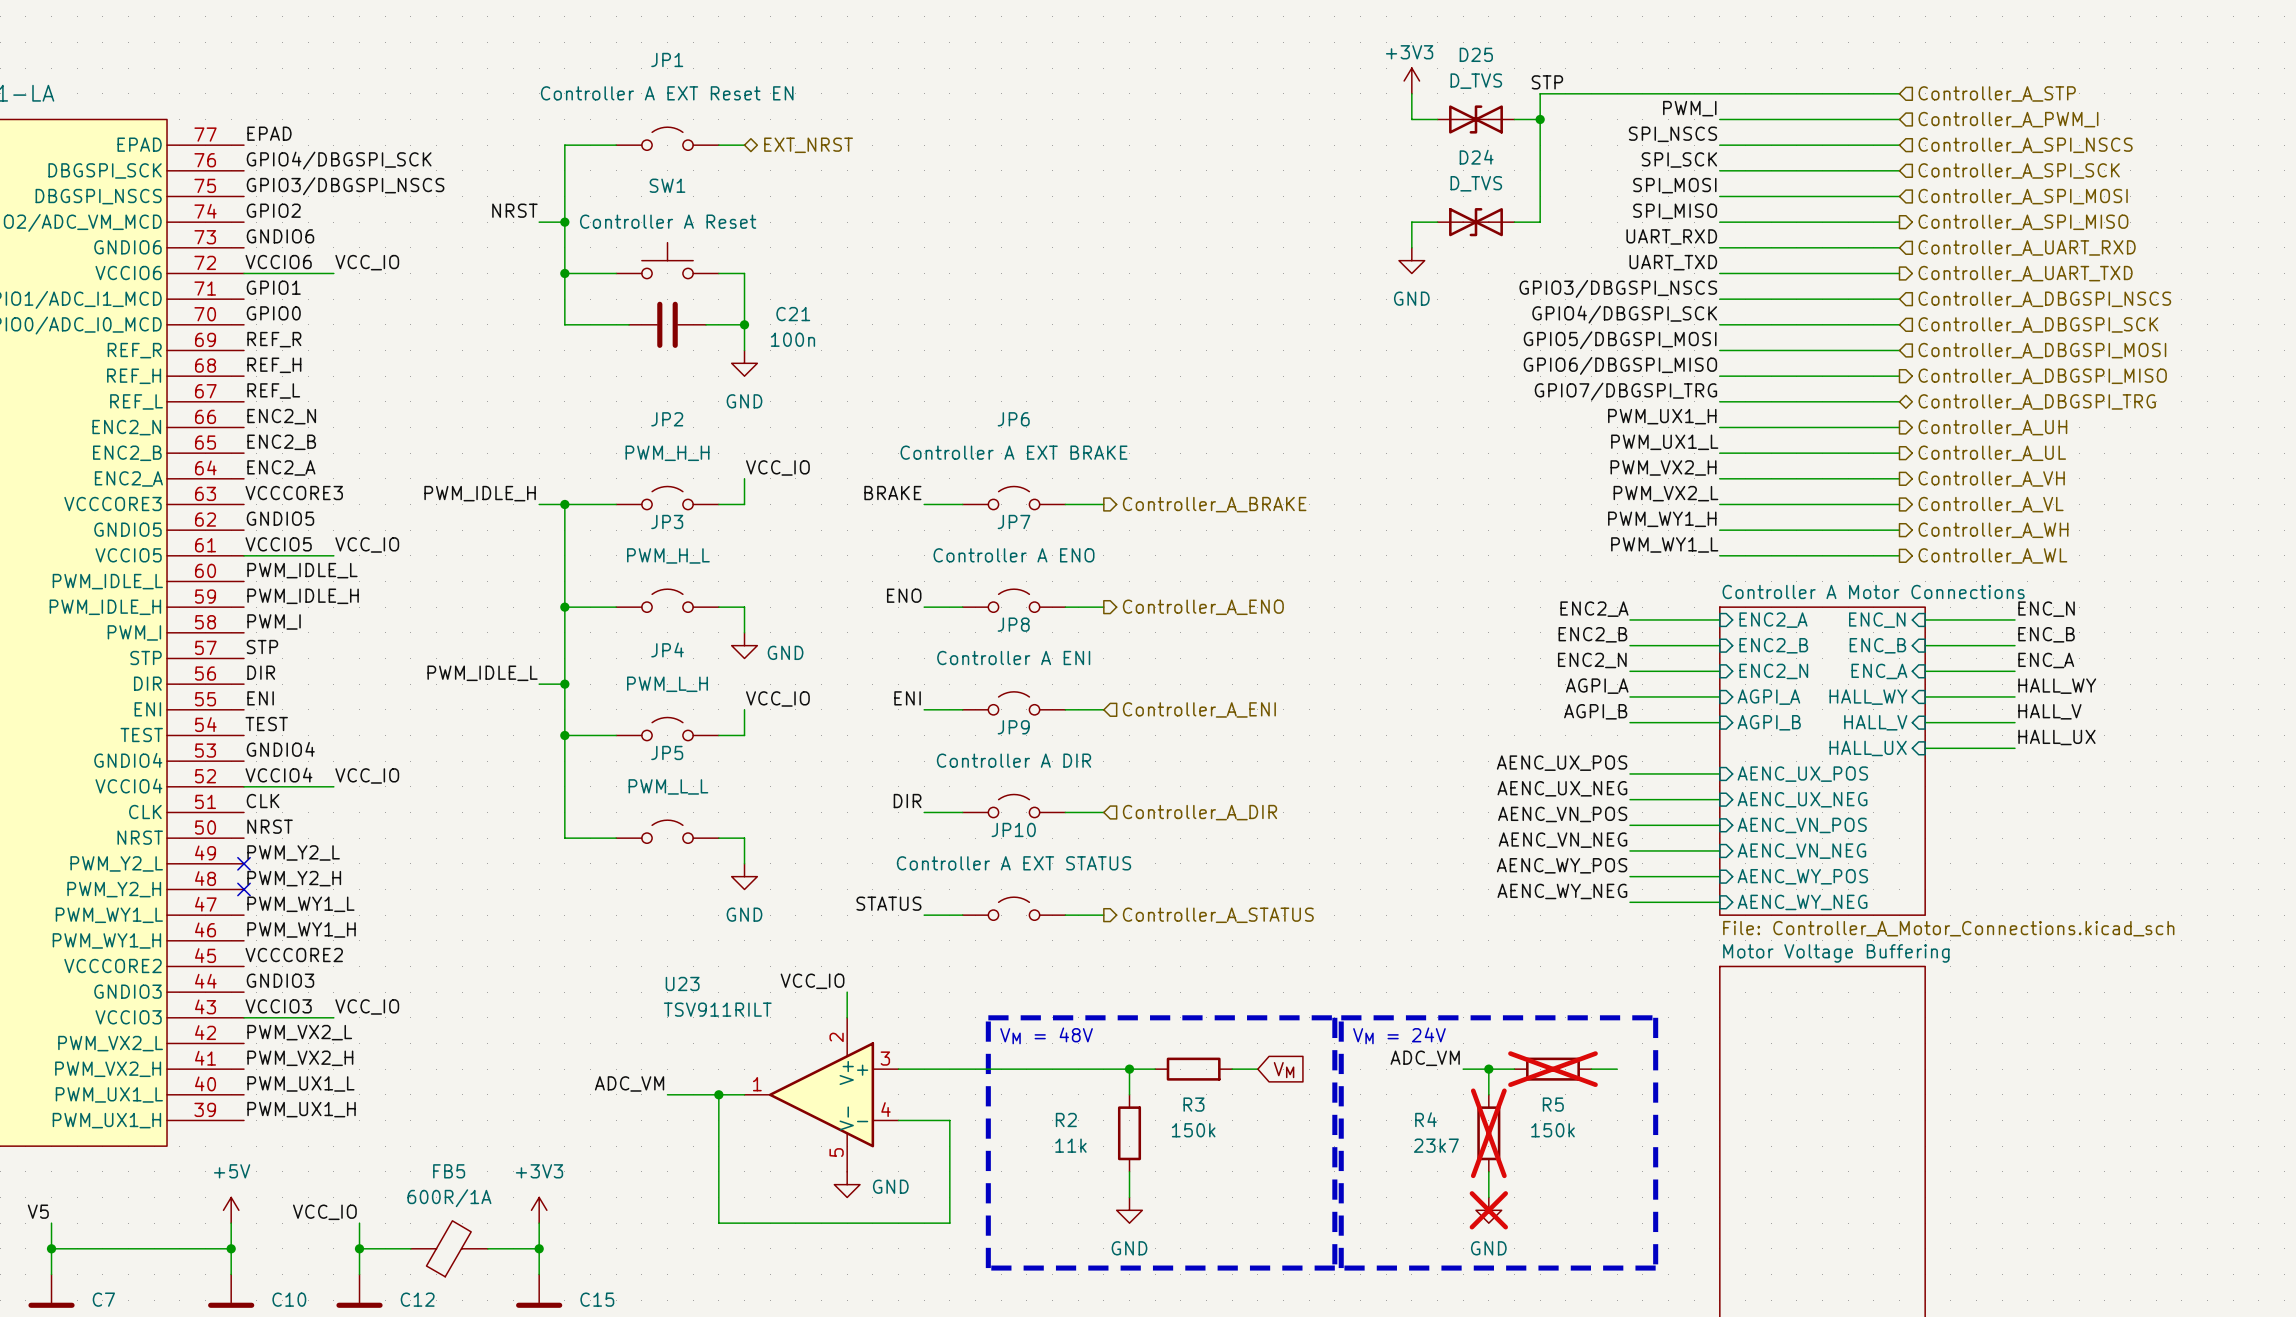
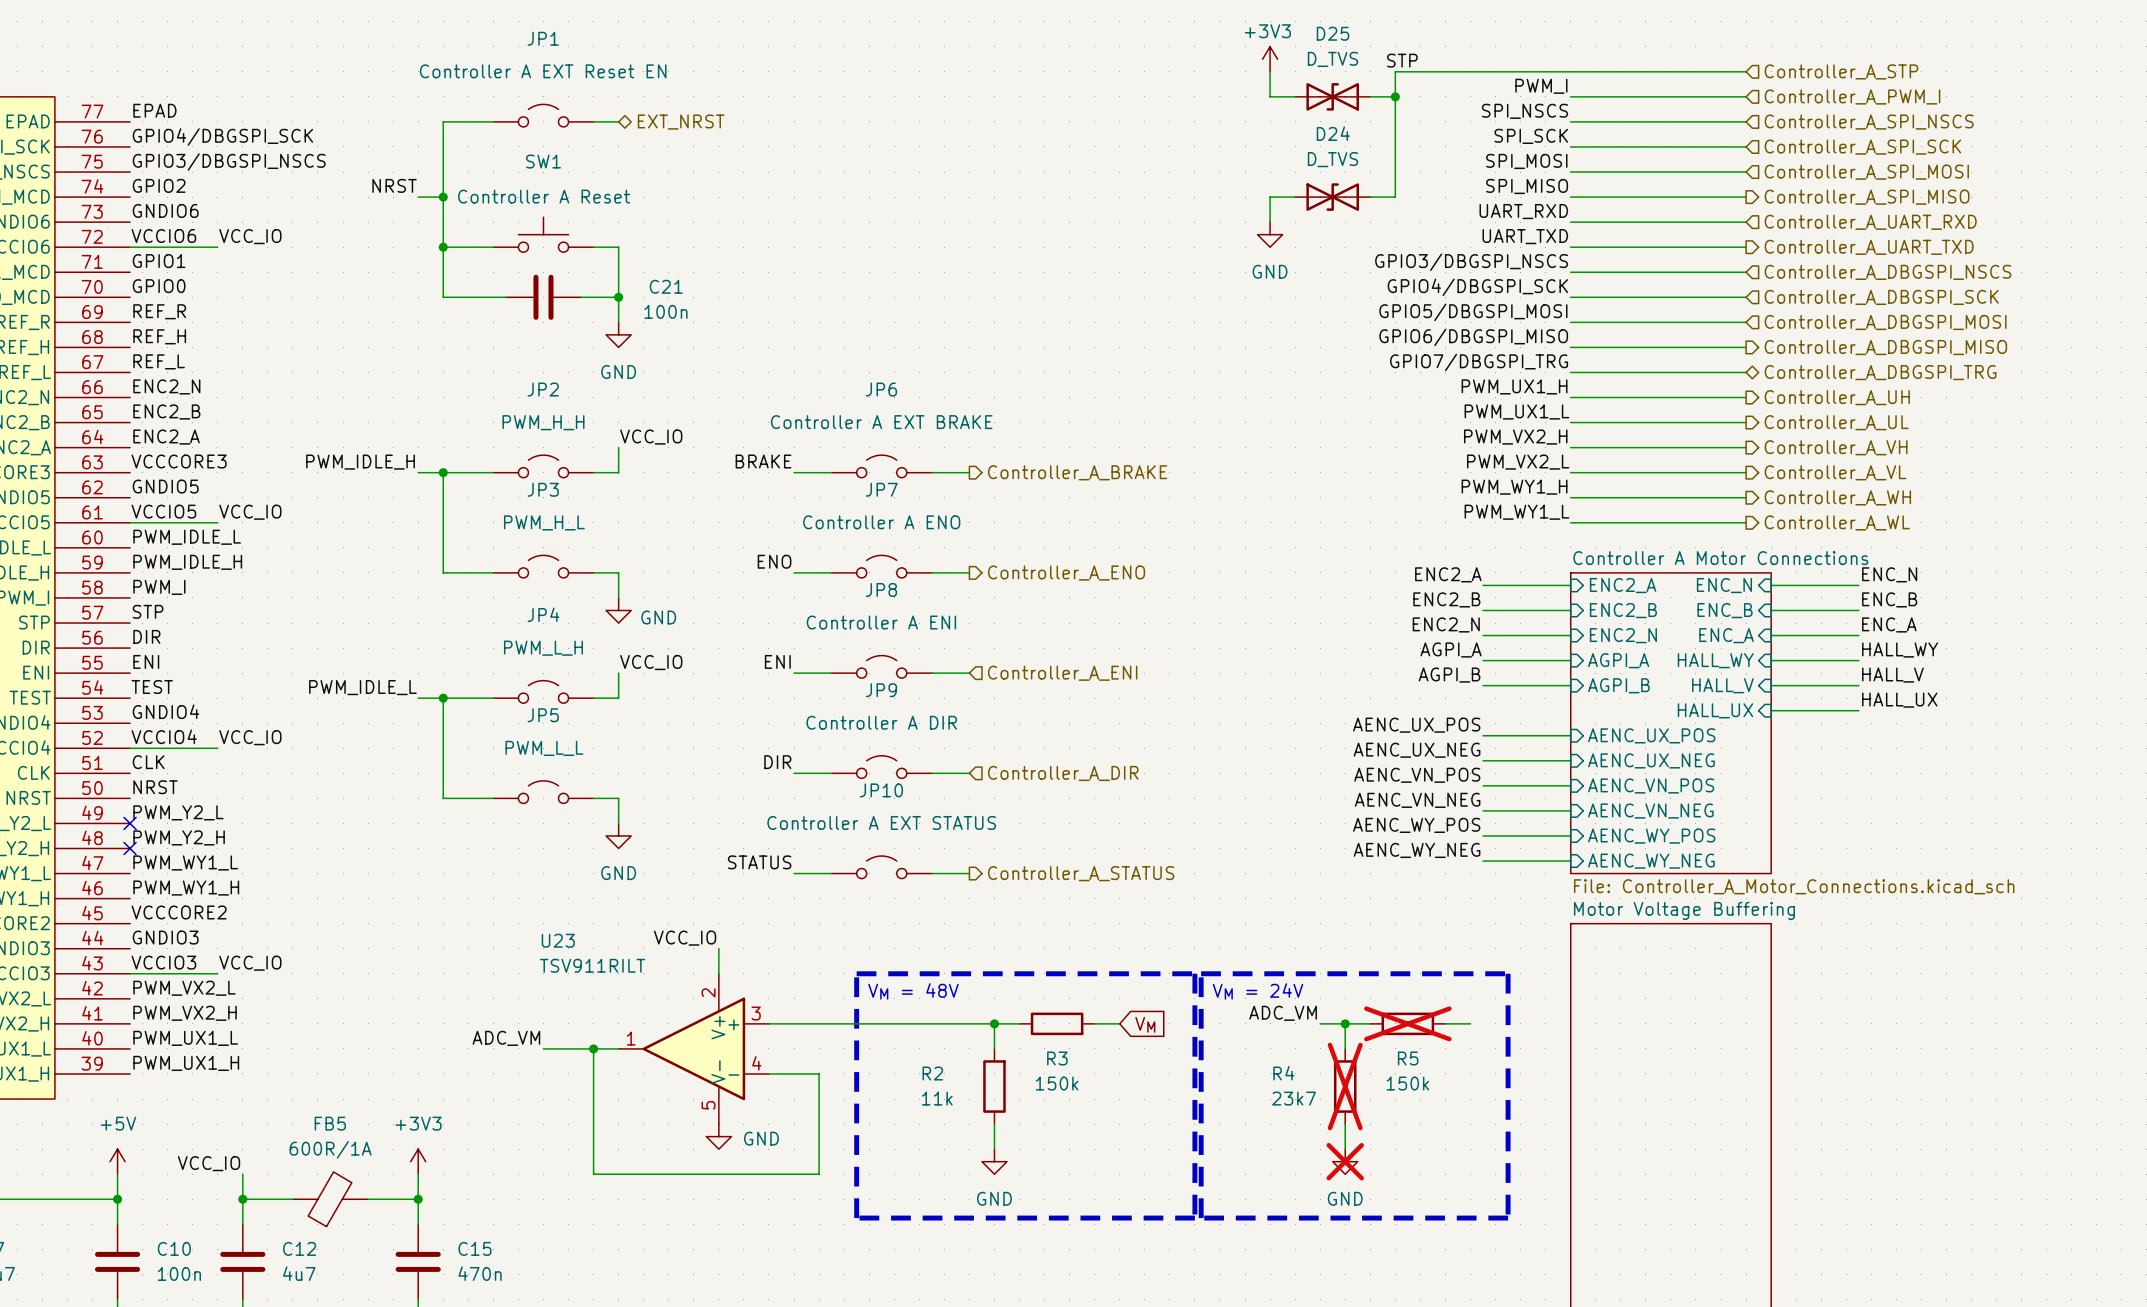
wire: (564, 607) (564, 735) -> (418, 698) (443, 698)
junction: (564, 607) -> none
label position: PWM_IDLE_L (482, 673) -> PWM_IDLE_L (362, 687)
wire: (539, 684) (564, 684) -> none
junction: (564, 684) -> none

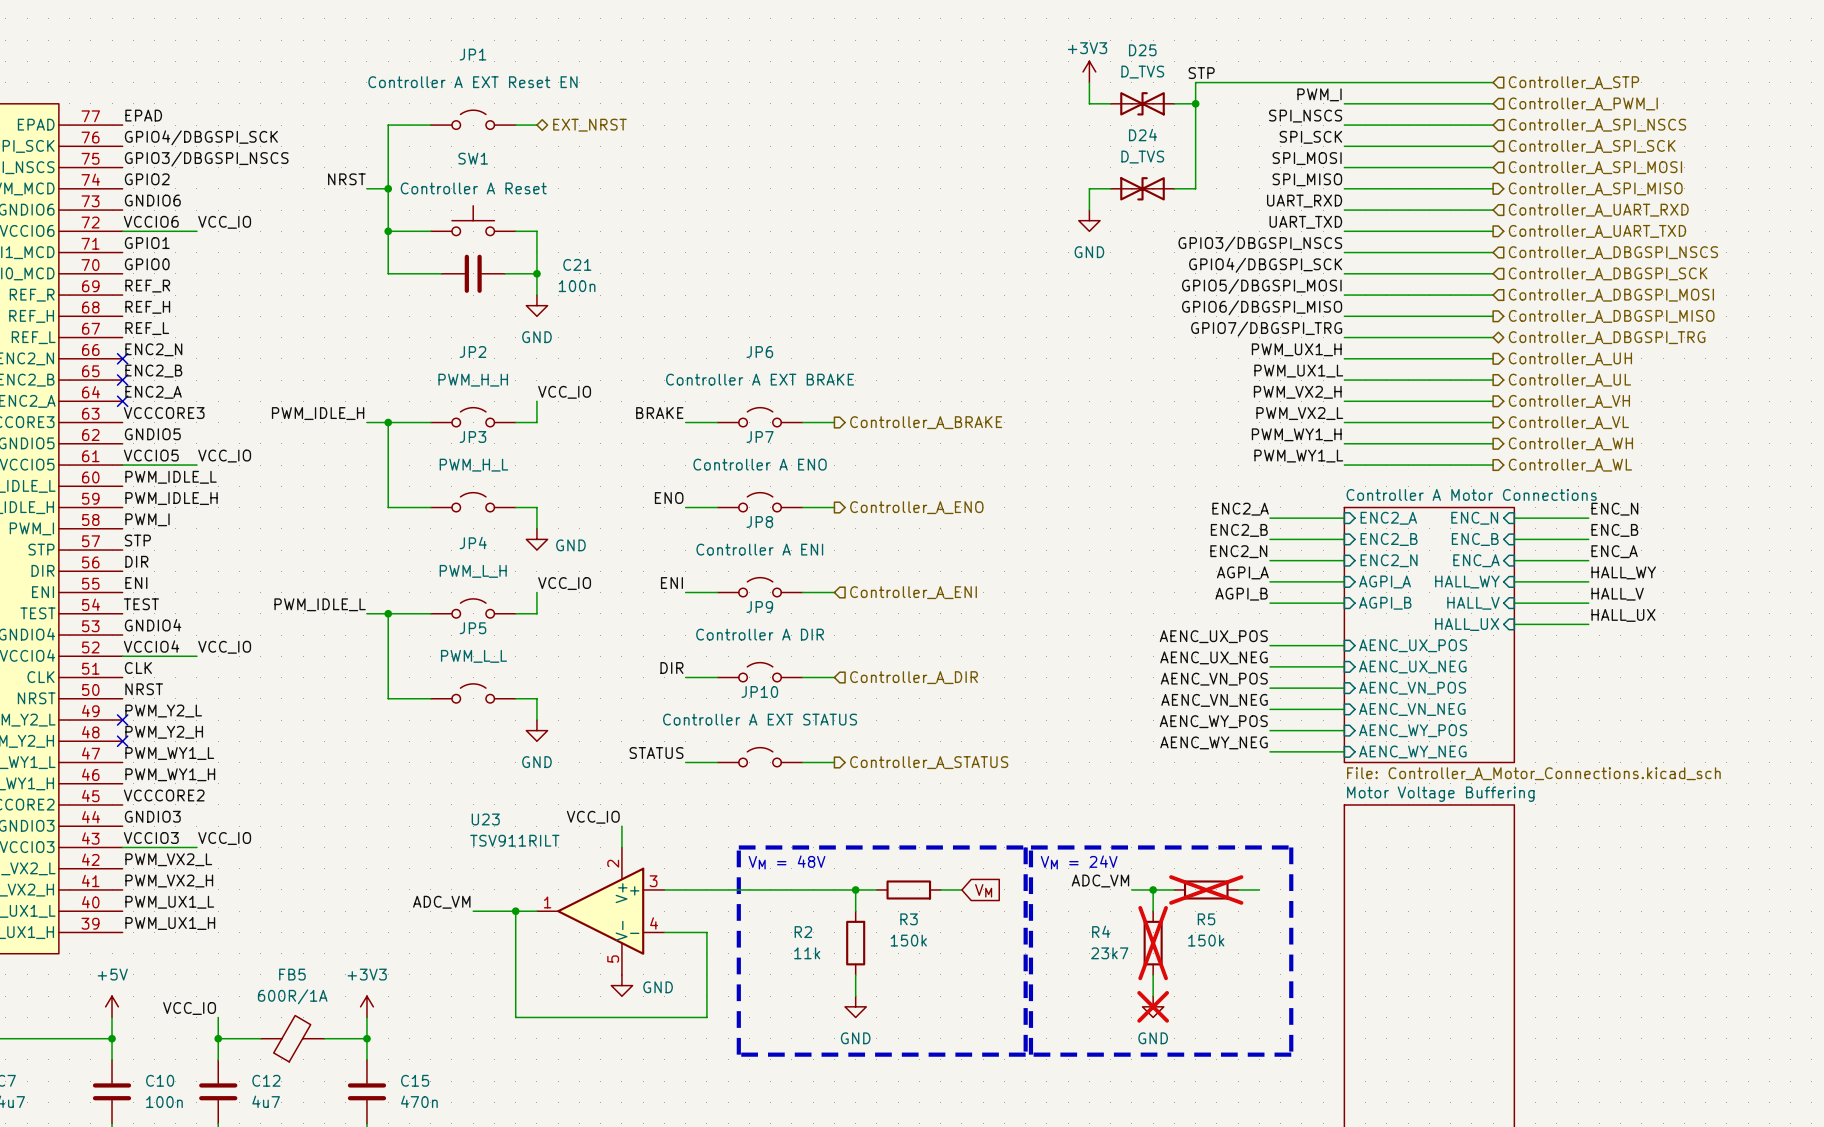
no-connect mark: none -> (122, 358)
no-connect mark: none -> (122, 380)
no-connect mark: none -> (122, 401)

